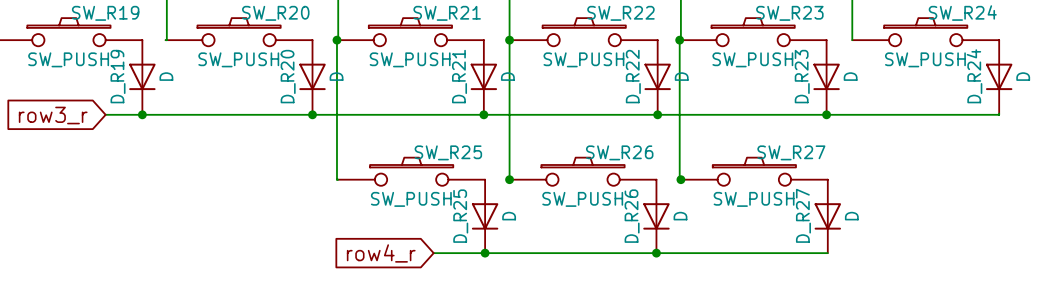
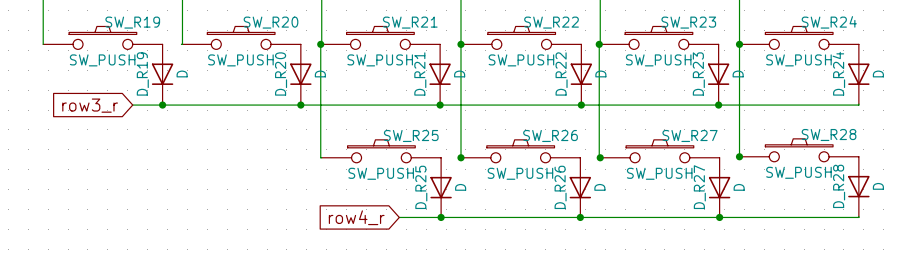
wire: none -> (739, 44) (740, 156)
junction: none -> (739, 44)
SW_R28: none -> SW_PUSH (799, 150)
junction: none -> (739, 156)
D_R28: none -> D (858, 186)
wire: none -> (858, 216) (719, 217)
junction: none -> (719, 217)

